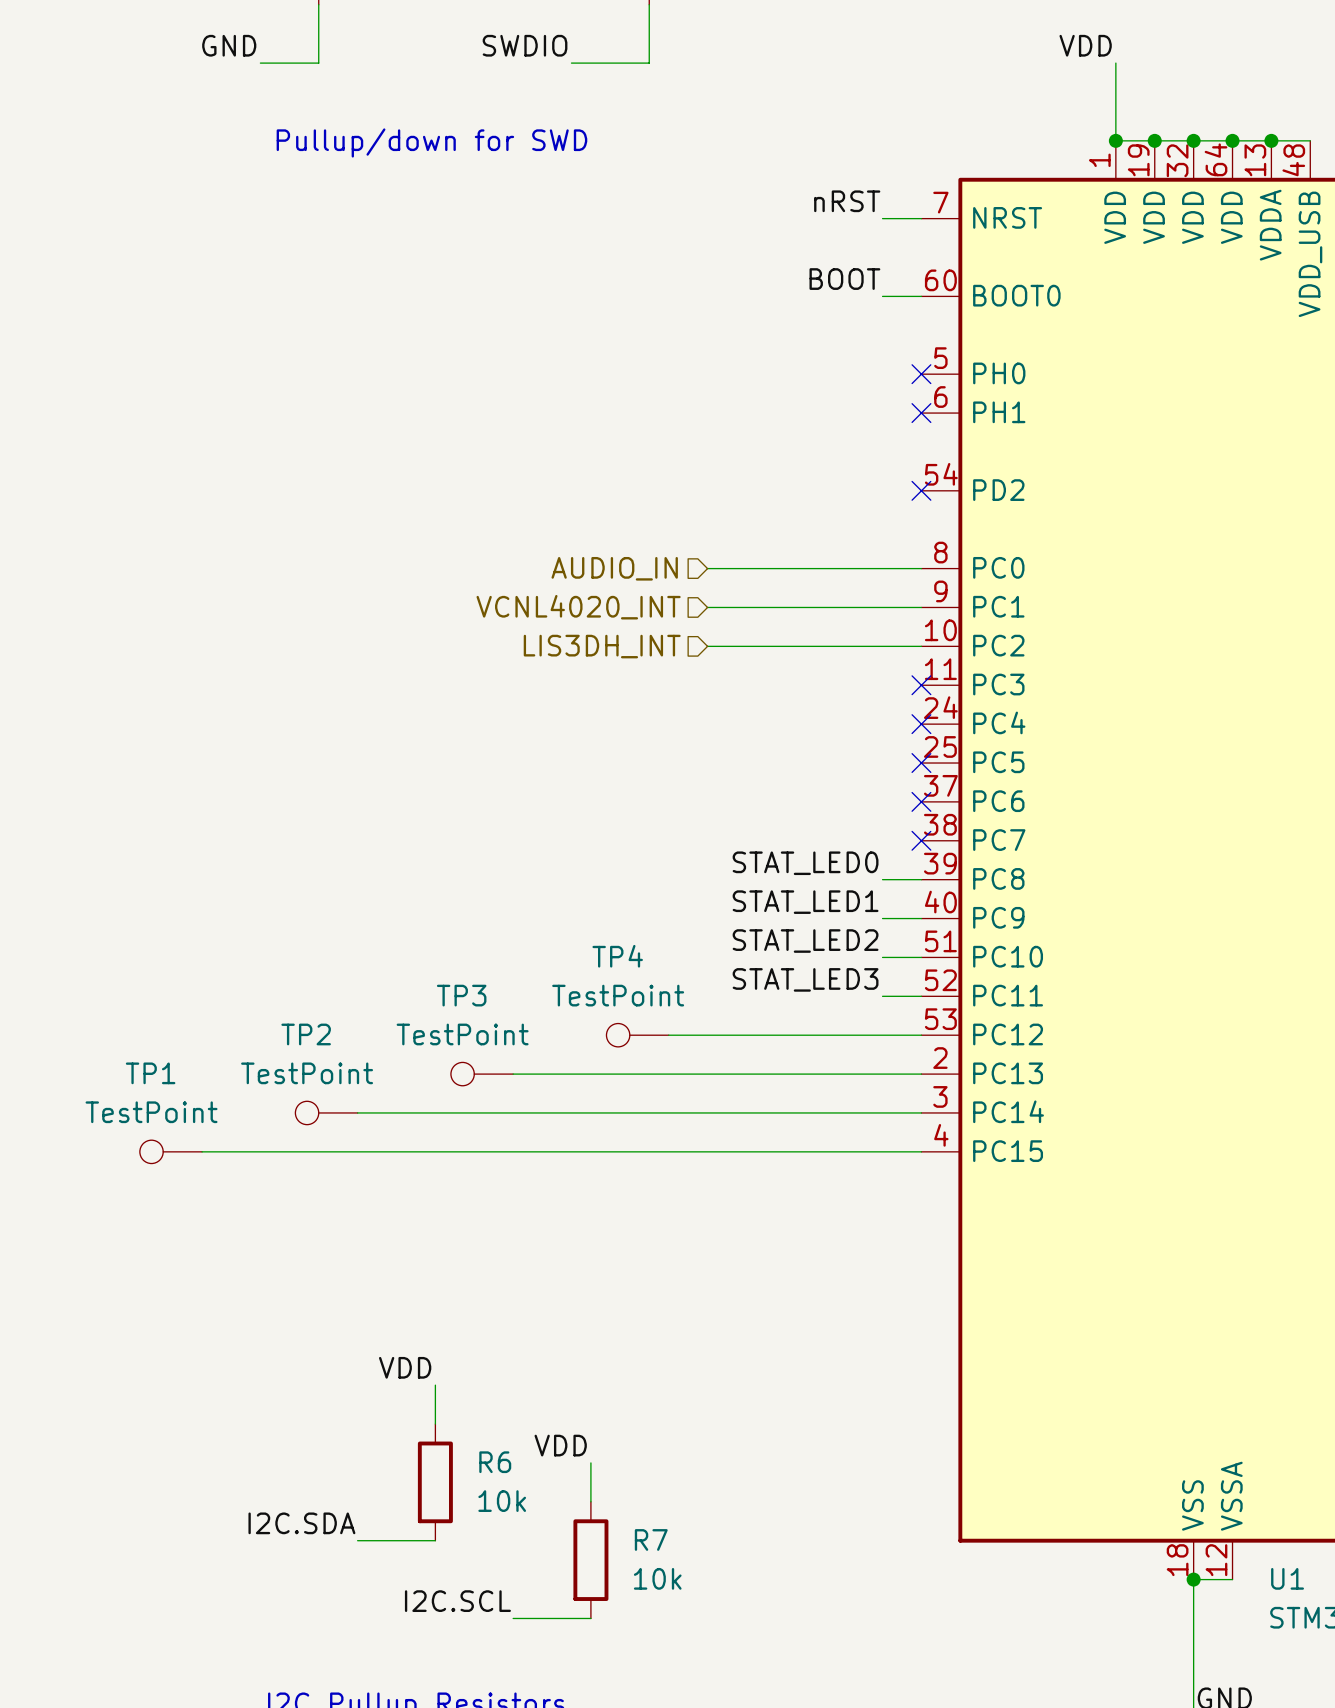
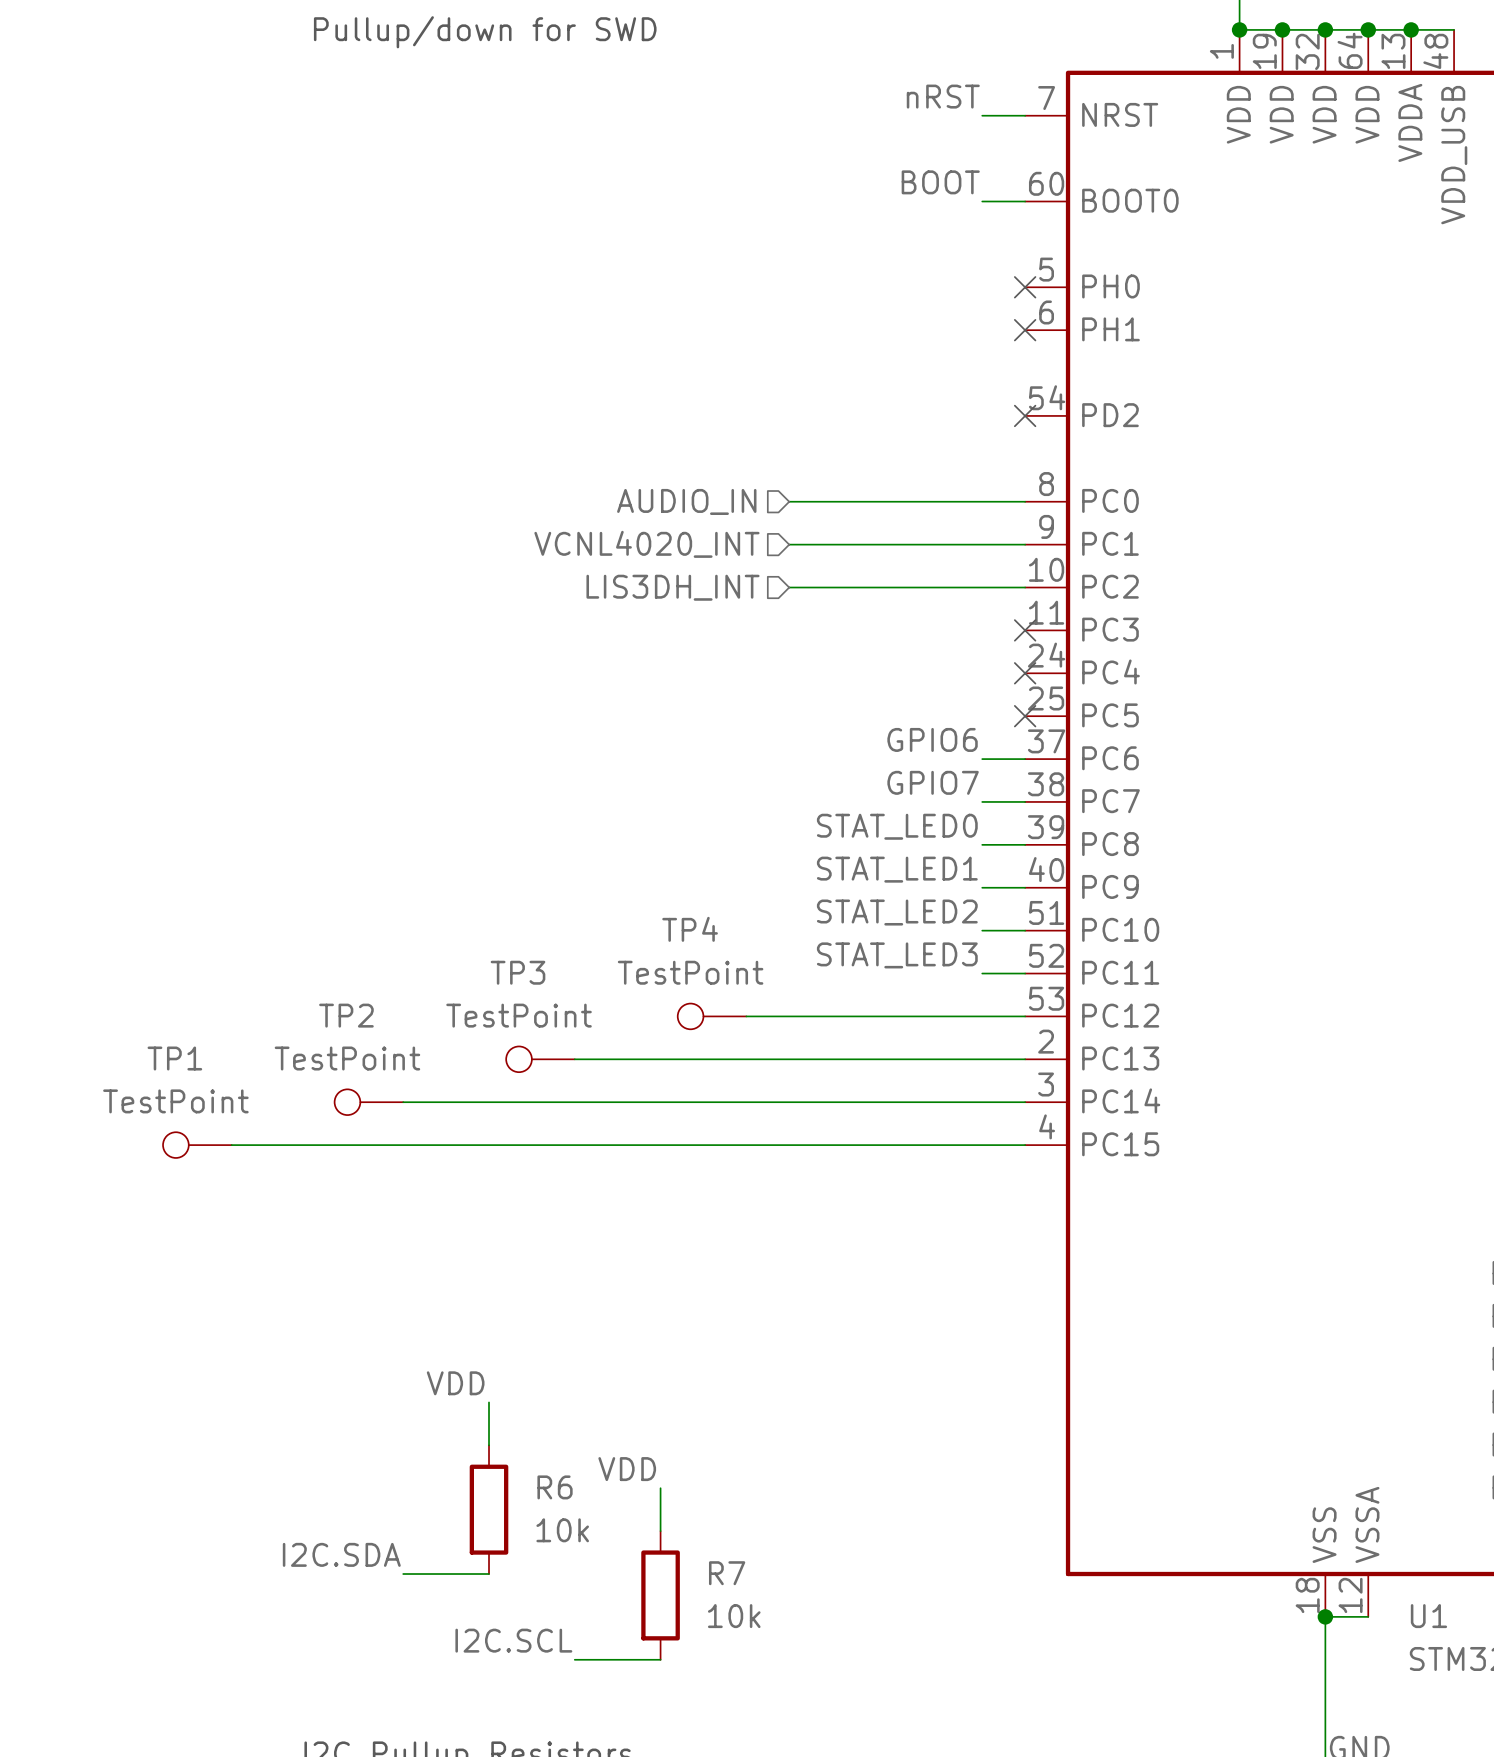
label: none -> GPIO6 (932, 739)
wire: none -> (982, 759) (1025, 759)
no-connect mark: (921, 801) -> none
label: none -> GPIO7 (933, 782)
wire: none -> (982, 801) (1025, 801)
no-connect mark: (921, 840) -> none

